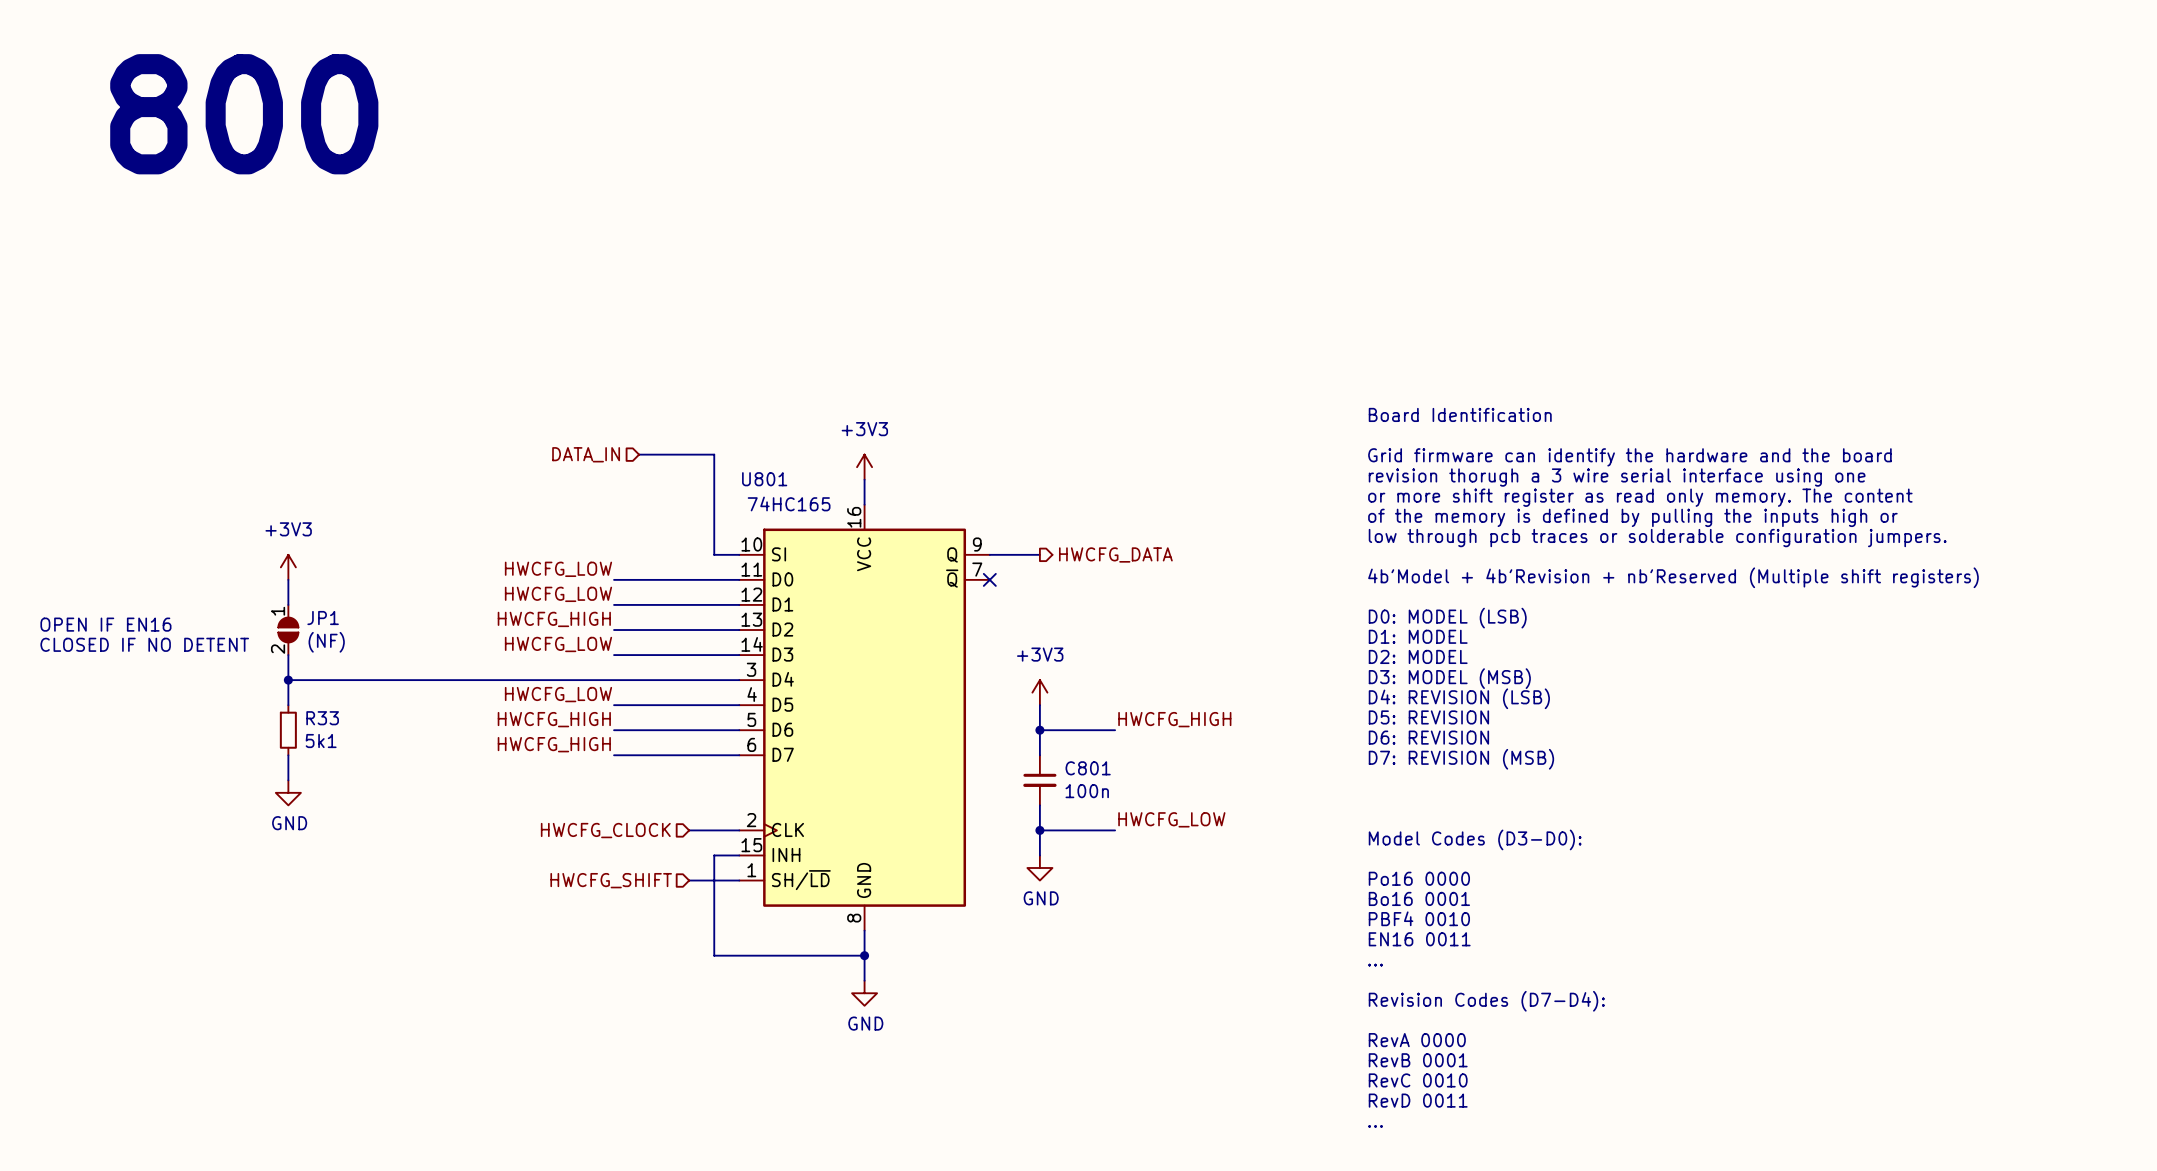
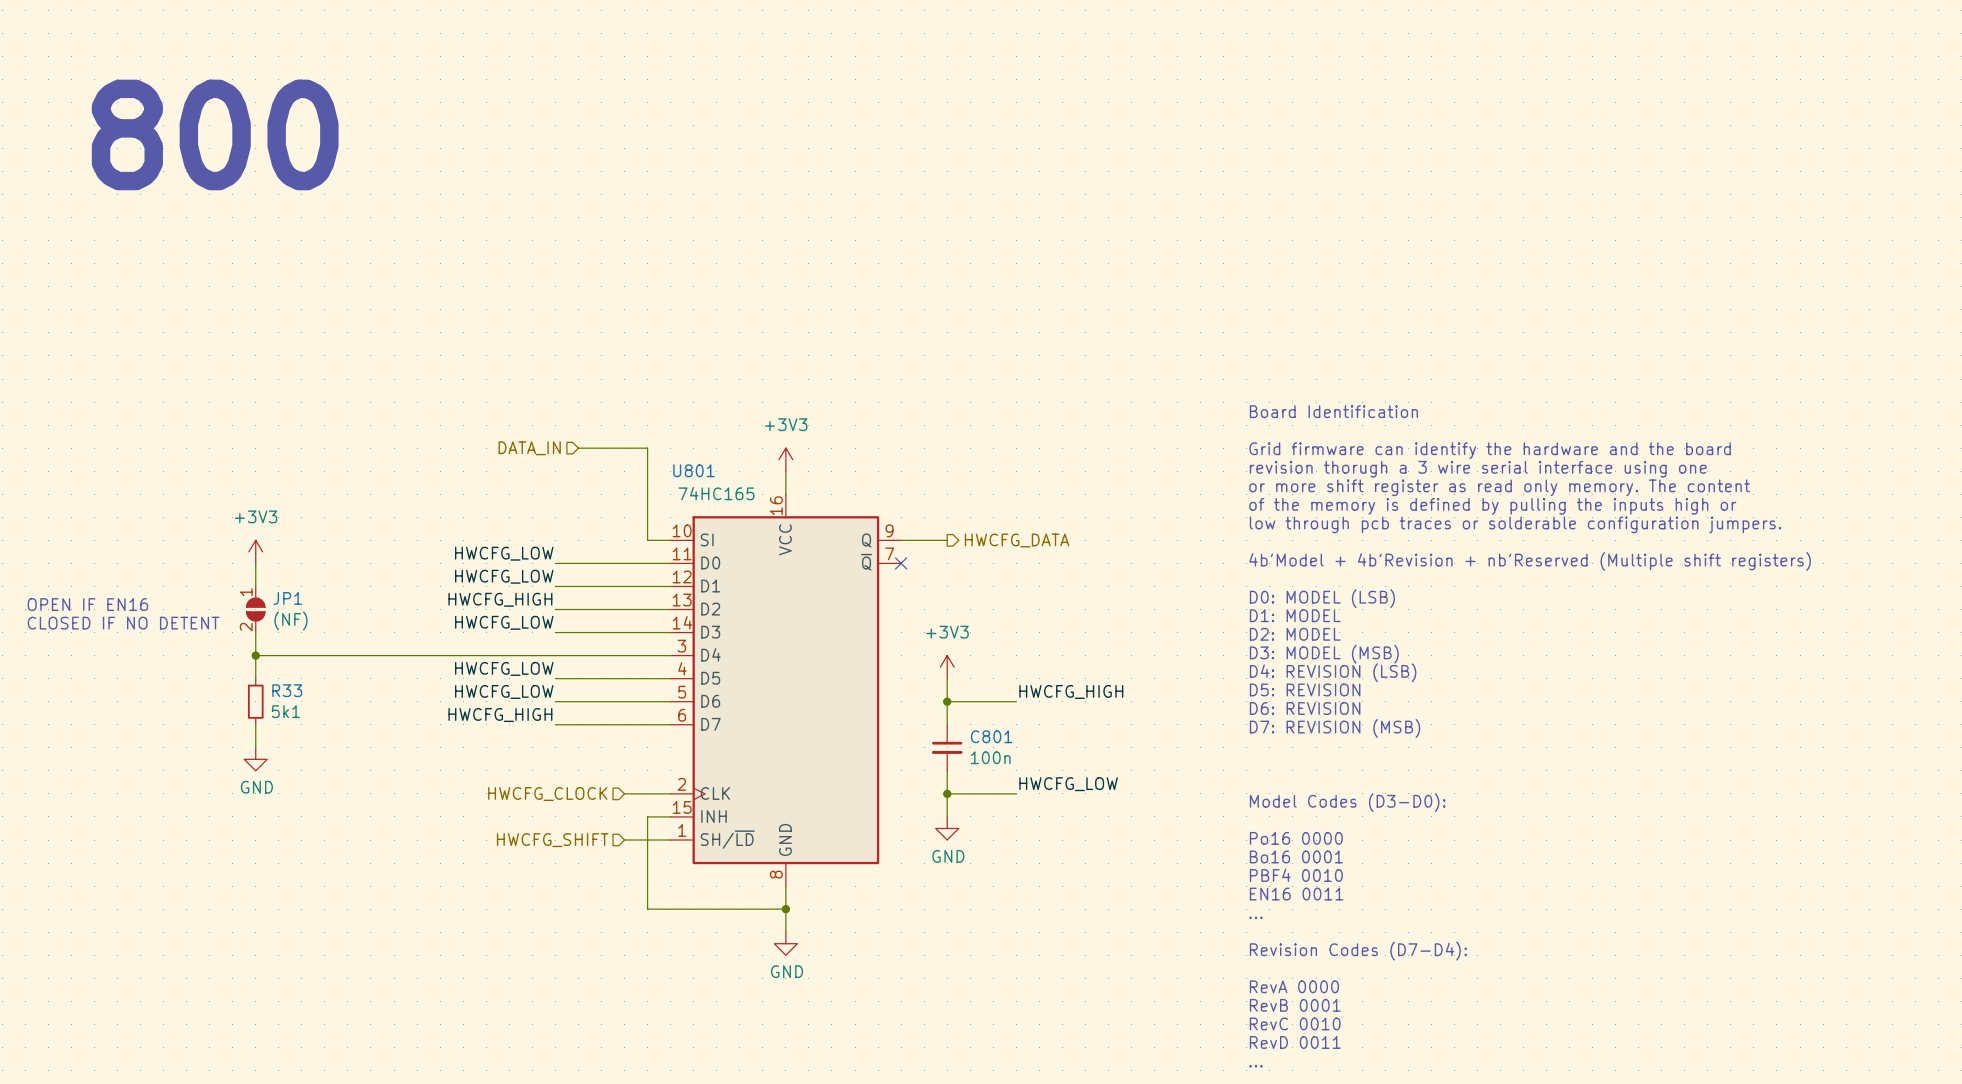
label: HWCFG_HIGH (554, 719) -> HWCFG_LOW (504, 691)

